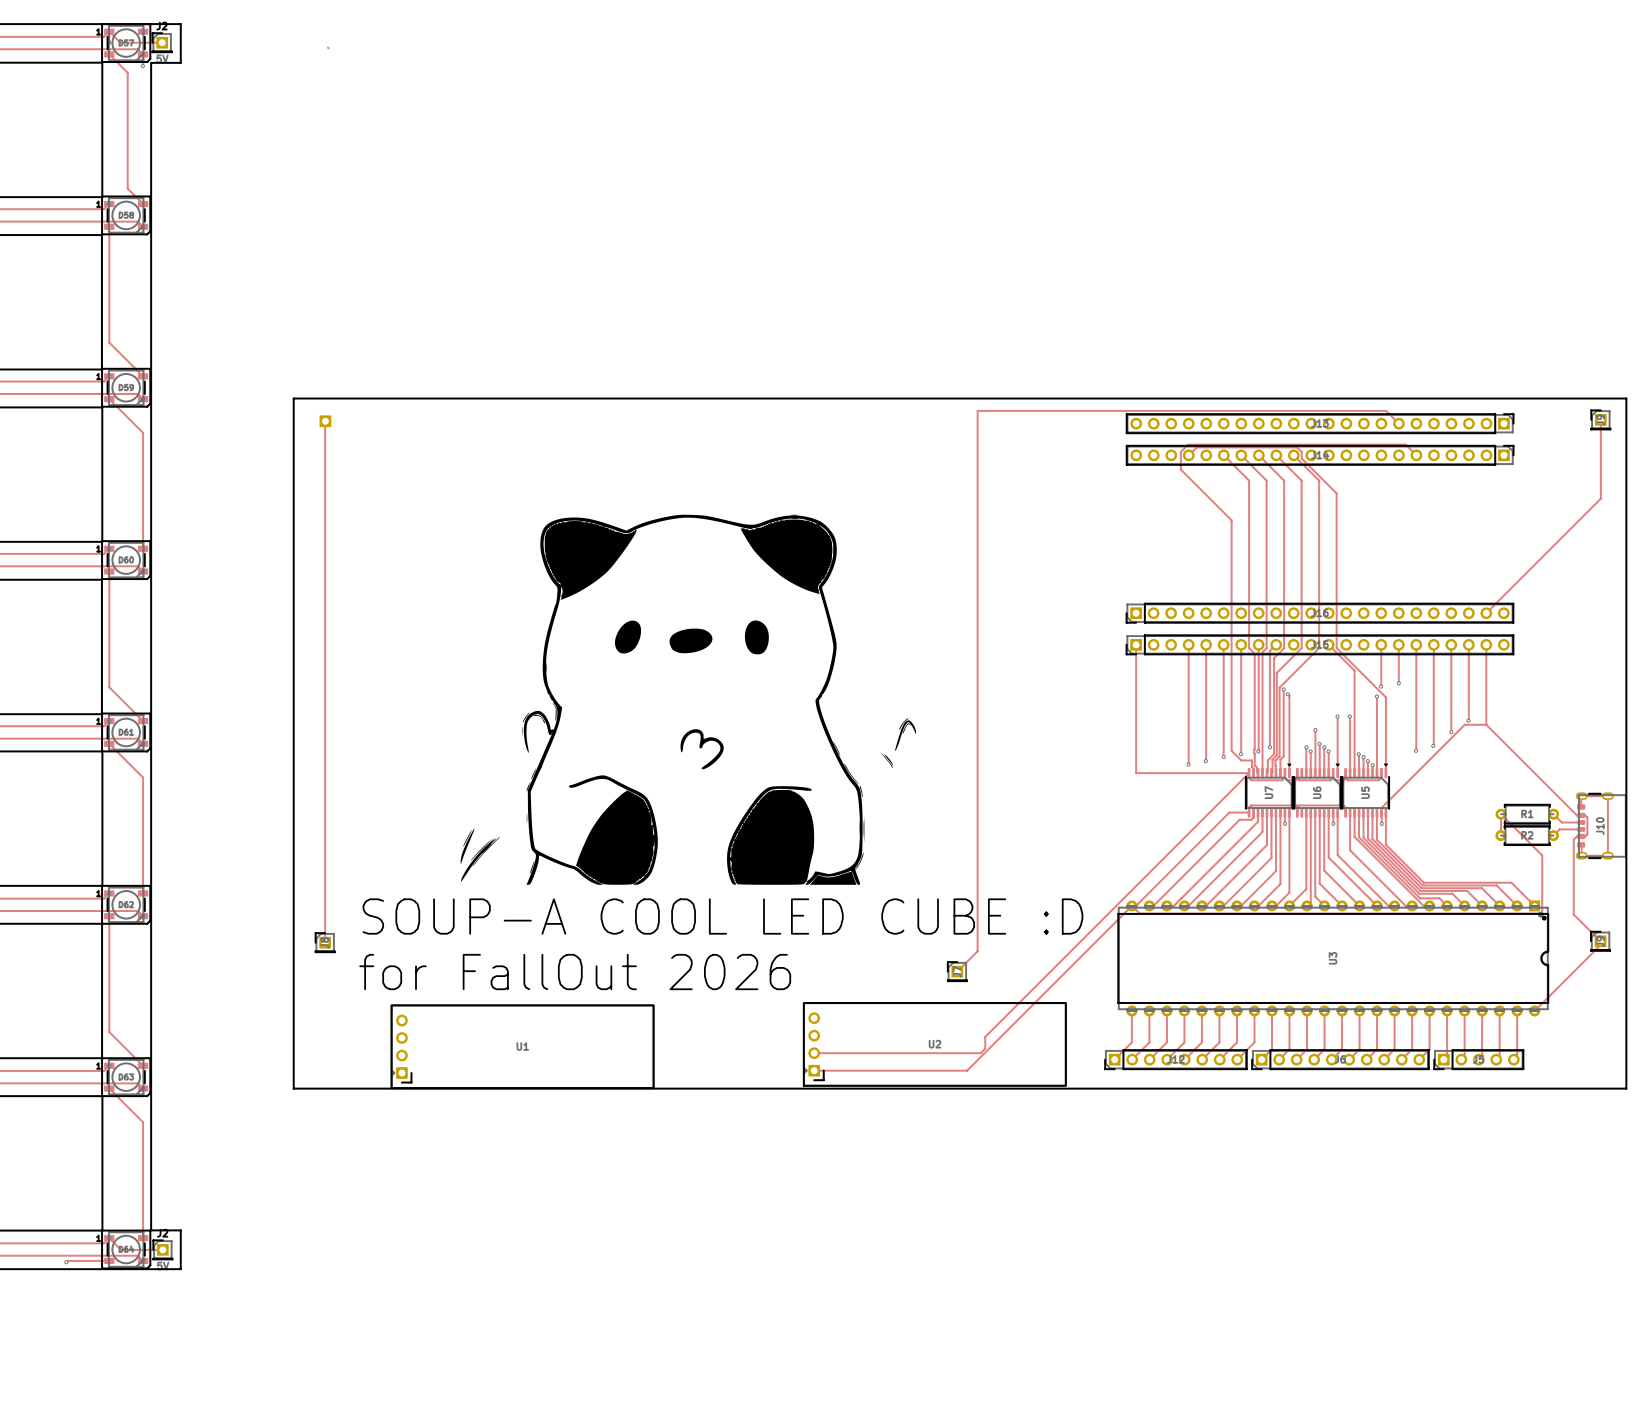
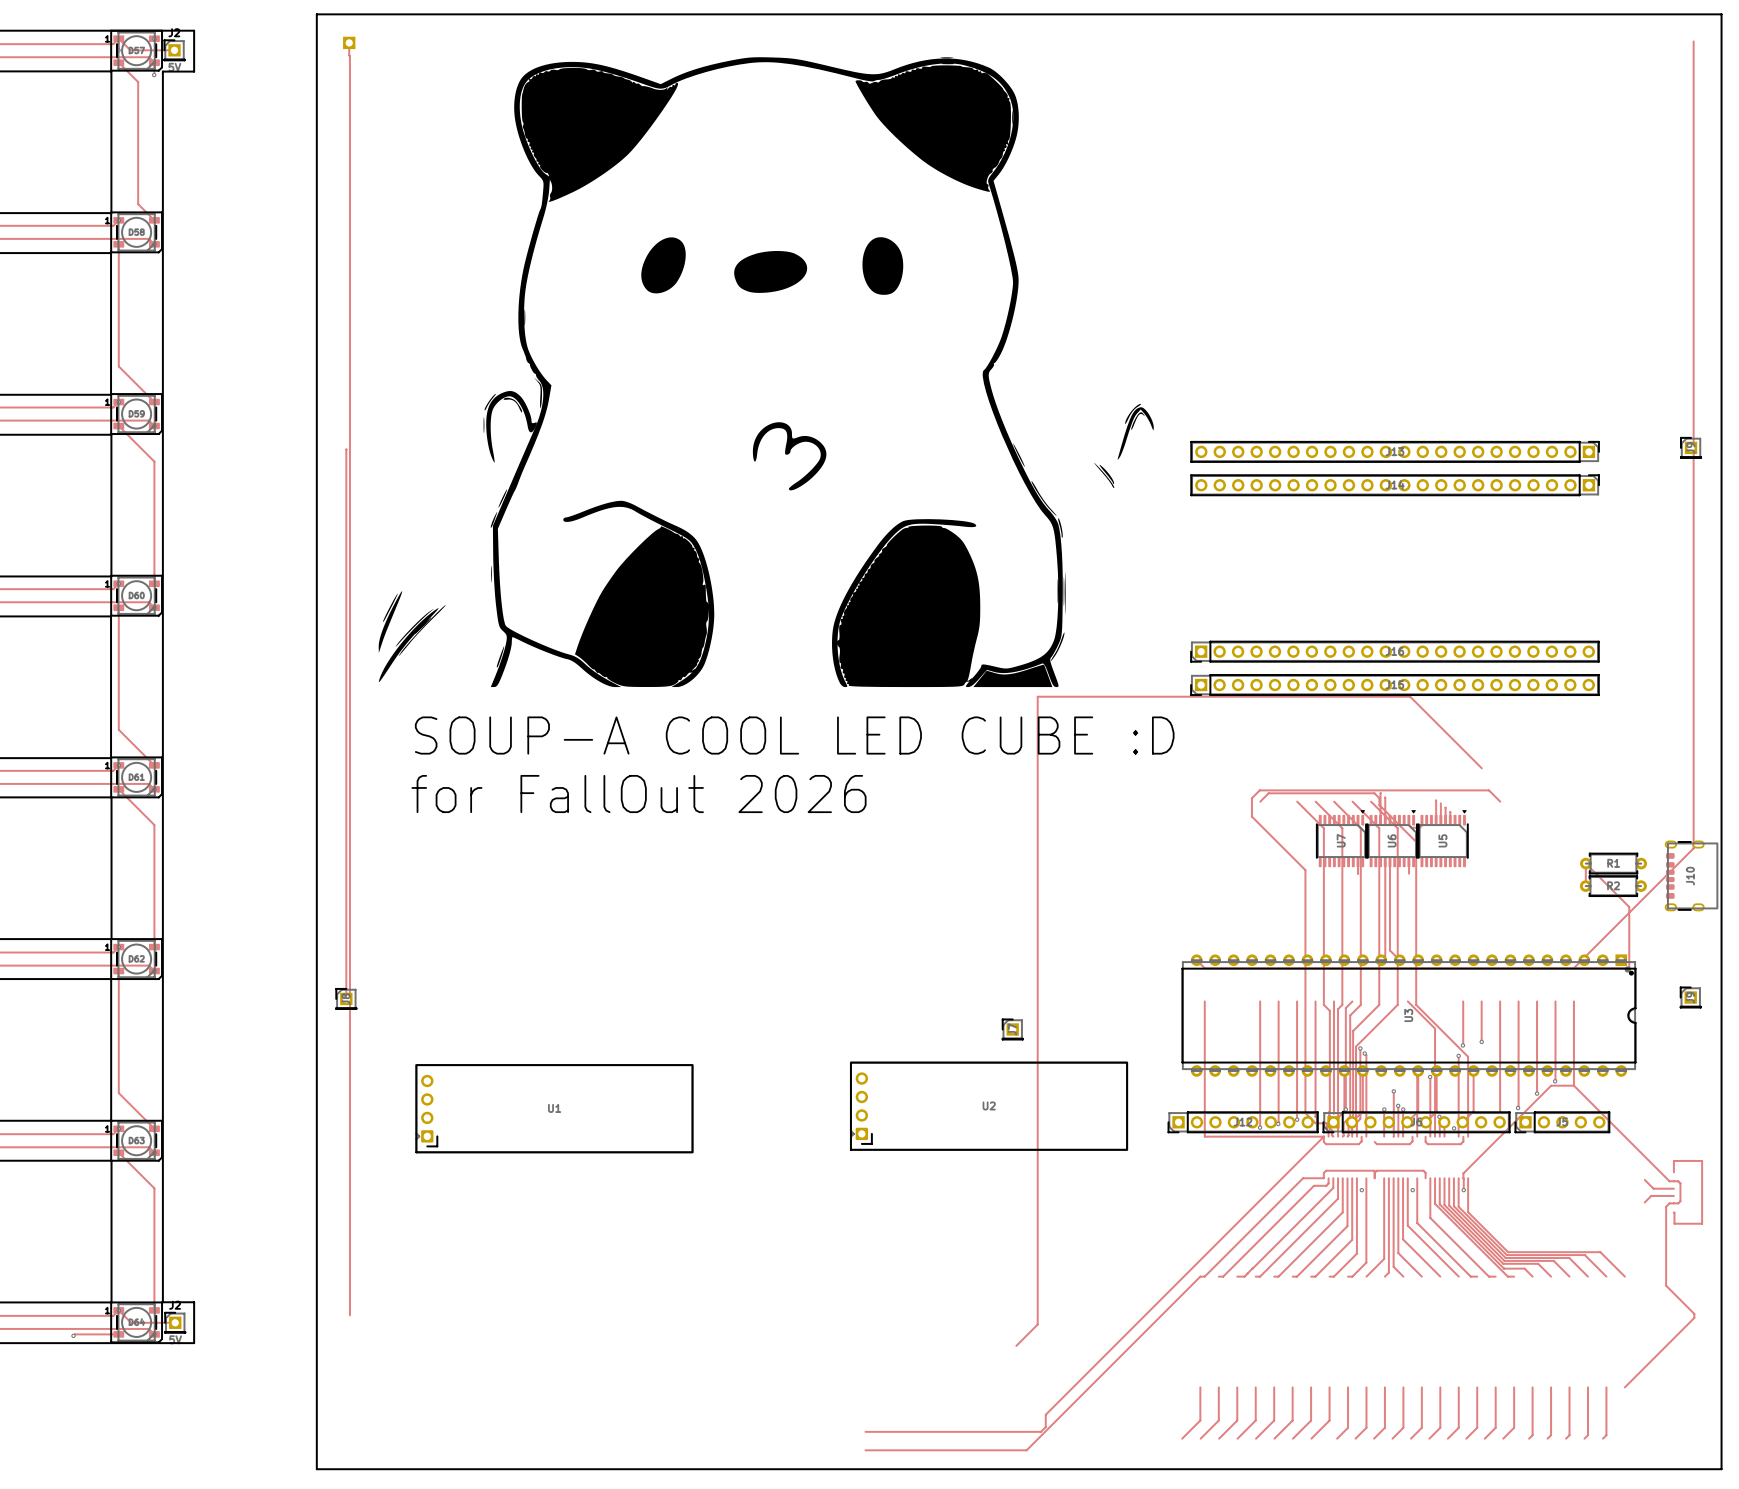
board edge: none -> (316, 14) (1721, 14) (1721, 1469) (316, 1469) (316, 14)
track: none -> (1693, 41) (1693, 848) (1573, 968)
track: none -> (349, 42) (349, 55)
part: none -> (349, 42)
track: none -> (349, 56) (349, 1315)
drawing: none -> [483, 57, 1066, 688]
drawing: none -> [1094, 403, 1154, 489]
board edge: (293, 398) (1626, 398) (1626, 1088) (293, 1088) (293, 398) -> none
track: (1600, 419) (1600, 498) (1486, 613) -> none
part: (325, 421) -> none
track: (1398, 423) (1386, 410) (977, 410) (977, 951) (957, 971) -> none
track: (1188, 455) (1196, 447) (1297, 447) (1301, 452) (1301, 458) (1336, 493) (1336, 648) (1385, 697) (1385, 773) -> none
track: (1223, 455) (1249, 480) (1249, 648) (1254, 653) (1254, 753) (1254, 765) (1258, 773) -> none
track: (1241, 455) (1266, 480) (1266, 648) (1262, 652) (1262, 773) -> none
track: (1258, 455) (1284, 480) (1284, 648) (1274, 658) (1274, 754) (1267, 760) (1266, 773) -> none
track: (1276, 455) (1301, 480) (1301, 648) (1276, 672) (1276, 755) (1272, 759) (1271, 773) -> none
track: (1293, 455) (1319, 480) (1319, 648) (1279, 687) (1279, 756) (1275, 760) (1275, 773) -> none
track: (1416, 455) (1405, 444) (1188, 444) (1180, 452) (1180, 469) (1231, 520) (1231, 750) (1241, 760) (1252, 760) (1253, 773) -> none
drawing: [522, 514, 865, 885] -> none
drawing: none -> [378, 591, 446, 683]
track: (1136, 644) (1136, 773) (1249, 773) -> none
track: (1188, 644) (1188, 764) -> none
track: (1206, 644) (1205, 761) -> none
track: (1223, 644) (1223, 756) -> none
track: (1241, 644) (1240, 754) -> none
track: (1258, 644) (1258, 751) -> none
track: (1276, 644) (1269, 651) (1269, 747) -> none
track: (1328, 644) (1354, 670) (1354, 773) -> none
track: (1381, 644) (1380, 686) -> none
track: (1398, 644) (1398, 683) -> none
track: (1416, 644) (1416, 750) -> none
track: (1433, 644) (1433, 745) -> none
track: (1451, 644) (1451, 732) -> none
track: (1468, 644) (1468, 720) -> none
track: (1486, 644) (1486, 724) -> none
via: (1398, 683) -> none
via: (1380, 686) -> none
track: (1283, 689) (1283, 756) (1280, 759) (1280, 773) -> none
via: (1283, 689) -> none
text: none -> SOUP-A COOL LED CUBE :D (794, 735)
track: (1287, 694) (1289, 695) (1289, 773) -> none
via: (1287, 694) -> none
track: (1376, 696) (1376, 773) -> none
via: (1376, 696) -> none
track: (1337, 716) (1337, 773) -> none
via: (1337, 716) -> none
track: (1349, 716) (1350, 773) -> none
via: (1349, 716) -> none
drawing: [881, 718, 917, 768] -> none
via: (1468, 720) -> none
track: none -> (1481, 768) (1410, 696) (1037, 696) (1037, 1324) (1016, 1345)
track: (1486, 724) (1577, 815) (1585, 815) (1587, 817) (1587, 834) (1585, 836) (1577, 836) (1573, 839) (1573, 914) (1600, 941) (1600, 945) (1534, 1010) -> none
track: (1486, 724) (1464, 724) (1381, 808) (1381, 823) -> none
track: (1315, 730) (1315, 773) -> none
via: (1315, 730) -> none
via: (1451, 732) -> none
track: (1319, 743) (1319, 773) -> none
via: (1319, 743) -> none
via: (1433, 745) -> none
via: (1269, 747) -> none
via: (1306, 747) -> none
track: (1324, 747) (1324, 773) -> none
via: (1324, 747) -> none
text: none -> for FallOut 2026 (638, 794)
via: (1416, 750) -> none
via: (1258, 751) -> none
via: (1310, 751) -> none
track: (1328, 751) (1328, 773) -> none
via: (1328, 751) -> none
via: (1240, 754) -> none
via: (1358, 754) -> none
track: none -> (1260, 801) (1268, 793) (1374, 793) (1379, 798) (1379, 805) (1416, 841) (1416, 1004) (1468, 1056) (1468, 1136)
track: none -> (1297, 801) (1323, 828) (1323, 1004) (1329, 1010) (1329, 1115) (1329, 1129) (1333, 1136)
track: none -> (1315, 801) (1342, 828) (1342, 1004) (1338, 1009) (1338, 1136)
track: none -> (1334, 801) (1360, 828) (1360, 1004) (1350, 1015) (1350, 1116) (1343, 1123) (1342, 1136)
track: none -> (1352, 801) (1379, 828) (1379, 1004) (1353, 1031) (1353, 1117) (1348, 1122) (1347, 1136)
track: none -> (1371, 801) (1397, 828) (1397, 1004) (1356, 1046) (1356, 1119) (1351, 1123) (1352, 1136)
track: none -> (1500, 801) (1489, 790) (1259, 790) (1251, 798) (1251, 816) (1305, 870) (1305, 1113) (1315, 1123) (1326, 1123) (1328, 1136)
via: (1223, 757) -> none
via: (1363, 757) -> none
via: (1205, 761) -> none
via: (1367, 761) -> none
via: (1188, 764) -> none
via: (1372, 765) -> none
track: (1249, 773) (1251, 780) (1282, 780) (1284, 777) (1287, 780) (1295, 780) (1297, 773) -> none
track: (1249, 773) (985, 1036) (985, 1048) (980, 1053) (814, 1053) -> none
track: (1333, 773) (1333, 777) (1330, 780) (1299, 780) (1297, 778) -> none
track: (1345, 773) (1347, 780) (1378, 780) (1381, 777) (1381, 773) -> none
track: (1581, 806) (1581, 796) (1607, 796) (1607, 855) (1581, 855) (1581, 844) -> none
track: (1297, 807) (1299, 805) (1343, 805) (1345, 812) -> none
track: (1253, 812) (1251, 819) (1239, 819) (1153, 905) (1149, 905) -> none
track: (1258, 812) (1258, 821) (1173, 905) (1166, 905) -> none
track: (1262, 812) (1262, 831) (1188, 905) (1184, 905) -> none
track: (1266, 812) (1266, 845) (1206, 905) (1201, 905) -> none
track: (1271, 812) (1271, 858) (1223, 905) (1219, 905) -> none
track: (1275, 812) (1275, 871) (1241, 905) (1236, 905) -> none
track: (1280, 812) (1280, 884) (1258, 905) (1254, 905) -> none
track: (1289, 812) (1289, 892) (1276, 905) (1271, 905) -> none
track: (1297, 812) (1296, 805) (1251, 805) (1249, 812) (1229, 812) (1136, 905) (1131, 905) (967, 1070) (814, 1070) -> none
track: (1306, 812) (1306, 889) (1289, 905) -> none
track: (1319, 812) (1319, 883) (1342, 905) -> none
track: (1324, 812) (1324, 870) (1359, 905) -> none
track: (1328, 812) (1328, 857) (1377, 905) -> none
track: (1337, 812) (1337, 855) (1388, 905) (1394, 905) -> none
track: (1350, 812) (1350, 850) (1405, 905) (1412, 905) -> none
track: (1354, 812) (1354, 836) (1423, 905) (1429, 905) -> none
track: (1359, 812) (1359, 837) (1420, 898) (1439, 898) (1447, 905) -> none
track: (1363, 812) (1363, 837) (1419, 893) (1452, 893) (1464, 905) -> none
track: (1367, 812) (1367, 838) (1420, 890) (1467, 890) (1482, 905) -> none
track: (1372, 812) (1372, 839) (1421, 888) (1481, 888) (1499, 905) -> none
track: (1376, 812) (1376, 839) (1422, 885) (1496, 885) (1517, 905) -> none
track: (1385, 812) (1385, 844) (1423, 882) (1511, 882) (1534, 905) -> none
track: (1553, 814) (1561, 822) (1581, 822) -> none
via: (1285, 823) -> none
via: (1333, 823) -> none
via: (1381, 823) -> none
drawing: [460, 828, 501, 882] -> none
track: (1581, 829) (1559, 829) (1553, 835) -> none
text: SOUP-A COOL LED CUBE :D (722, 916) -> none
track: none -> (1204, 1001) (1204, 1136) (1323, 1136)
track: none -> (1260, 1001) (1260, 1127)
track: none -> (1278, 1001) (1278, 1124)
track: none -> (1297, 1001) (1297, 1119)
track: none -> (1315, 1001) (1315, 1116)
track: none -> (1333, 1001) (1333, 1113)
track: none -> (1352, 1001) (1345, 1008) (1345, 1109)
track: none -> (1407, 1001) (1435, 1028) (1435, 1136)
track: none -> (1463, 1001) (1462, 1045)
track: none -> (1481, 1001) (1481, 1041)
track: none -> (1500, 1001) (1499, 1113)
track: none -> (1518, 1001) (1518, 1108)
track: none -> (1537, 1001) (1537, 1093)
track: none -> (1555, 1001) (1555, 1081)
track: none -> (1573, 1001) (1573, 1085)
text: for FallOut 2026 (575, 972) -> none
via: none -> (1481, 1041)
via: none -> (1462, 1045)
track: none -> (1360, 1048) (1360, 1118) (1356, 1122) (1356, 1136)
via: none -> (1360, 1048)
track: none -> (1364, 1053) (1366, 1055) (1366, 1136)
via: none -> (1364, 1053)
track: none -> (1458, 1055) (1458, 1136)
via: none -> (1458, 1055)
track: (1131, 1010) (1131, 1042) (1114, 1059) -> none
track: (1149, 1010) (1149, 1042) (1132, 1059) -> none
track: (1166, 1010) (1166, 1042) (1149, 1059) -> none
track: (1184, 1010) (1184, 1042) (1167, 1059) -> none
track: (1201, 1010) (1201, 1042) (1184, 1059) -> none
track: (1219, 1010) (1219, 1042) (1202, 1059) -> none
track: (1236, 1010) (1236, 1042) (1219, 1059) -> none
track: (1254, 1010) (1254, 1042) (1237, 1059) -> none
track: (1307, 1010) (1307, 1049) (1296, 1059) -> none
track: (1324, 1010) (1324, 1049) (1314, 1059) -> none
track: (1377, 1010) (1377, 1049) (1366, 1059) -> none
track: (1412, 1010) (1412, 1049) (1401, 1059) -> none
track: (1429, 1010) (1429, 1049) (1419, 1059) -> none
track: (1447, 1010) (1447, 1056) (1443, 1059) -> none
track: (1464, 1010) (1464, 1056) (1461, 1059) -> none
track: (1482, 1010) (1482, 1056) (1478, 1059) -> none
track: (1499, 1010) (1499, 1056) (1496, 1059) -> none
track: (1517, 1010) (1517, 1056) (1513, 1059) -> none
track: none -> (1417, 1076) (1417, 1136)
track: none -> (1430, 1076) (1430, 1136)
via: none -> (1430, 1076)
via: none -> (1555, 1081)
track: none -> (1573, 1085) (1551, 1085) (1463, 1173) (1463, 1190)
track: none -> (1573, 1085) (1669, 1181) (1678, 1181) (1680, 1183) (1680, 1201) (1678, 1203) (1669, 1203) (1666, 1206) (1666, 1285) (1694, 1313) (1694, 1317) (1624, 1387)
track: none -> (1393, 1091) (1393, 1136)
via: none -> (1393, 1091)
via: none -> (1537, 1093)
track: none -> (1398, 1105) (1398, 1136)
via: none -> (1398, 1105)
via: none -> (1518, 1108)
via: none -> (1345, 1109)
track: none -> (1384, 1109) (1384, 1136)
via: none -> (1384, 1109)
track: none -> (1403, 1109) (1403, 1136)
via: none -> (1403, 1109)
track: none -> (1439, 1116) (1439, 1136)
via: none -> (1439, 1116)
via: none -> (1297, 1119)
track: none -> (1444, 1119) (1444, 1136)
via: none -> (1278, 1124)
via: none -> (1260, 1127)
via: none -> (1454, 1128)
track: none -> (1323, 1136) (1326, 1144) (1358, 1144) (1361, 1141) (1361, 1136)
track: none -> (1323, 1136) (1045, 1414) (1045, 1427) (1041, 1431) (865, 1431)
track: none -> (1412, 1136) (1412, 1141) (1409, 1144) (1376, 1144) (1374, 1142)
track: none -> (1425, 1136) (1427, 1144) (1460, 1144) (1463, 1141) (1463, 1136)
track: none -> (1374, 1172) (1376, 1170) (1423, 1170) (1425, 1178)
track: none -> (1673, 1172) (1674, 1160) (1702, 1160) (1702, 1223) (1674, 1223) (1673, 1212)
track: none -> (1328, 1178) (1326, 1185) (1314, 1185) (1223, 1276) (1218, 1276)
track: none -> (1333, 1178) (1333, 1187) (1244, 1276) (1237, 1276)
track: none -> (1338, 1178) (1338, 1198) (1260, 1276) (1255, 1276)
track: none -> (1342, 1178) (1342, 1212) (1278, 1276) (1274, 1276)
track: none -> (1347, 1178) (1347, 1226) (1297, 1276) (1292, 1276)
track: none -> (1352, 1178) (1352, 1239) (1315, 1276) (1311, 1276)
track: none -> (1356, 1178) (1356, 1253) (1333, 1276) (1329, 1276)
track: none -> (1366, 1178) (1366, 1262) (1352, 1276) (1348, 1276)
track: none -> (1374, 1178) (1374, 1170) (1326, 1170) (1323, 1178) (1303, 1178) (1204, 1276) (1200, 1276) (1026, 1450) (865, 1450)
track: none -> (1384, 1178) (1384, 1258) (1366, 1276)
track: none -> (1388, 1178) (1388, 1272) (1384, 1276)
track: none -> (1393, 1178) (1393, 1266) (1403, 1276)
track: none -> (1398, 1178) (1398, 1253) (1421, 1276)
track: none -> (1403, 1178) (1403, 1239) (1440, 1276)
track: none -> (1407, 1178) (1407, 1225) (1458, 1276)
track: none -> (1417, 1178) (1417, 1223) (1470, 1276) (1477, 1276)
track: none -> (1430, 1178) (1430, 1217) (1489, 1276) (1495, 1276)
track: none -> (1435, 1178) (1435, 1203) (1507, 1276) (1514, 1276)
track: none -> (1439, 1178) (1439, 1204) (1504, 1268) (1524, 1268) (1532, 1276)
track: none -> (1444, 1178) (1444, 1205) (1503, 1263) (1538, 1263) (1551, 1276)
track: none -> (1449, 1178) (1449, 1205) (1504, 1260) (1553, 1260) (1569, 1276)
track: none -> (1453, 1178) (1453, 1206) (1505, 1257) (1569, 1257) (1587, 1276)
track: none -> (1458, 1178) (1458, 1206) (1506, 1255) (1584, 1255) (1606, 1276)
track: none -> (1468, 1178) (1468, 1212) (1508, 1252) (1600, 1252) (1624, 1276)
track: none -> (1644, 1179) (1653, 1188) (1673, 1188)
via: none -> (1361, 1190)
via: none -> (1412, 1190)
via: none -> (1463, 1190)
track: none -> (1673, 1195) (1651, 1195) (1644, 1202)
track: none -> (1200, 1387) (1200, 1420) (1182, 1438)
track: none -> (1218, 1387) (1218, 1420) (1200, 1438)
track: none -> (1237, 1387) (1237, 1420) (1219, 1438)
track: none -> (1255, 1387) (1255, 1420) (1237, 1438)
track: none -> (1274, 1387) (1274, 1420) (1256, 1438)
track: none -> (1292, 1387) (1292, 1420) (1274, 1438)
track: none -> (1311, 1387) (1311, 1420) (1292, 1438)
track: none -> (1329, 1387) (1329, 1420) (1311, 1438)
track: none -> (1348, 1387) (1348, 1427) (1337, 1438)
track: none -> (1366, 1387) (1366, 1427) (1355, 1438)
track: none -> (1384, 1387) (1384, 1427) (1374, 1438)
track: none -> (1403, 1387) (1403, 1427) (1392, 1438)
track: none -> (1421, 1387) (1421, 1427) (1410, 1438)
track: none -> (1440, 1387) (1440, 1427) (1429, 1438)
track: none -> (1458, 1387) (1458, 1427) (1447, 1438)
track: none -> (1477, 1387) (1477, 1427) (1466, 1438)
track: none -> (1495, 1387) (1495, 1427) (1484, 1438)
track: none -> (1514, 1387) (1514, 1427) (1503, 1438)
track: none -> (1532, 1387) (1532, 1435) (1529, 1438)
track: none -> (1551, 1387) (1551, 1435) (1547, 1438)
track: none -> (1569, 1387) (1569, 1435) (1566, 1438)
track: none -> (1587, 1387) (1587, 1435) (1584, 1438)
track: none -> (1606, 1387) (1606, 1435) (1602, 1438)

